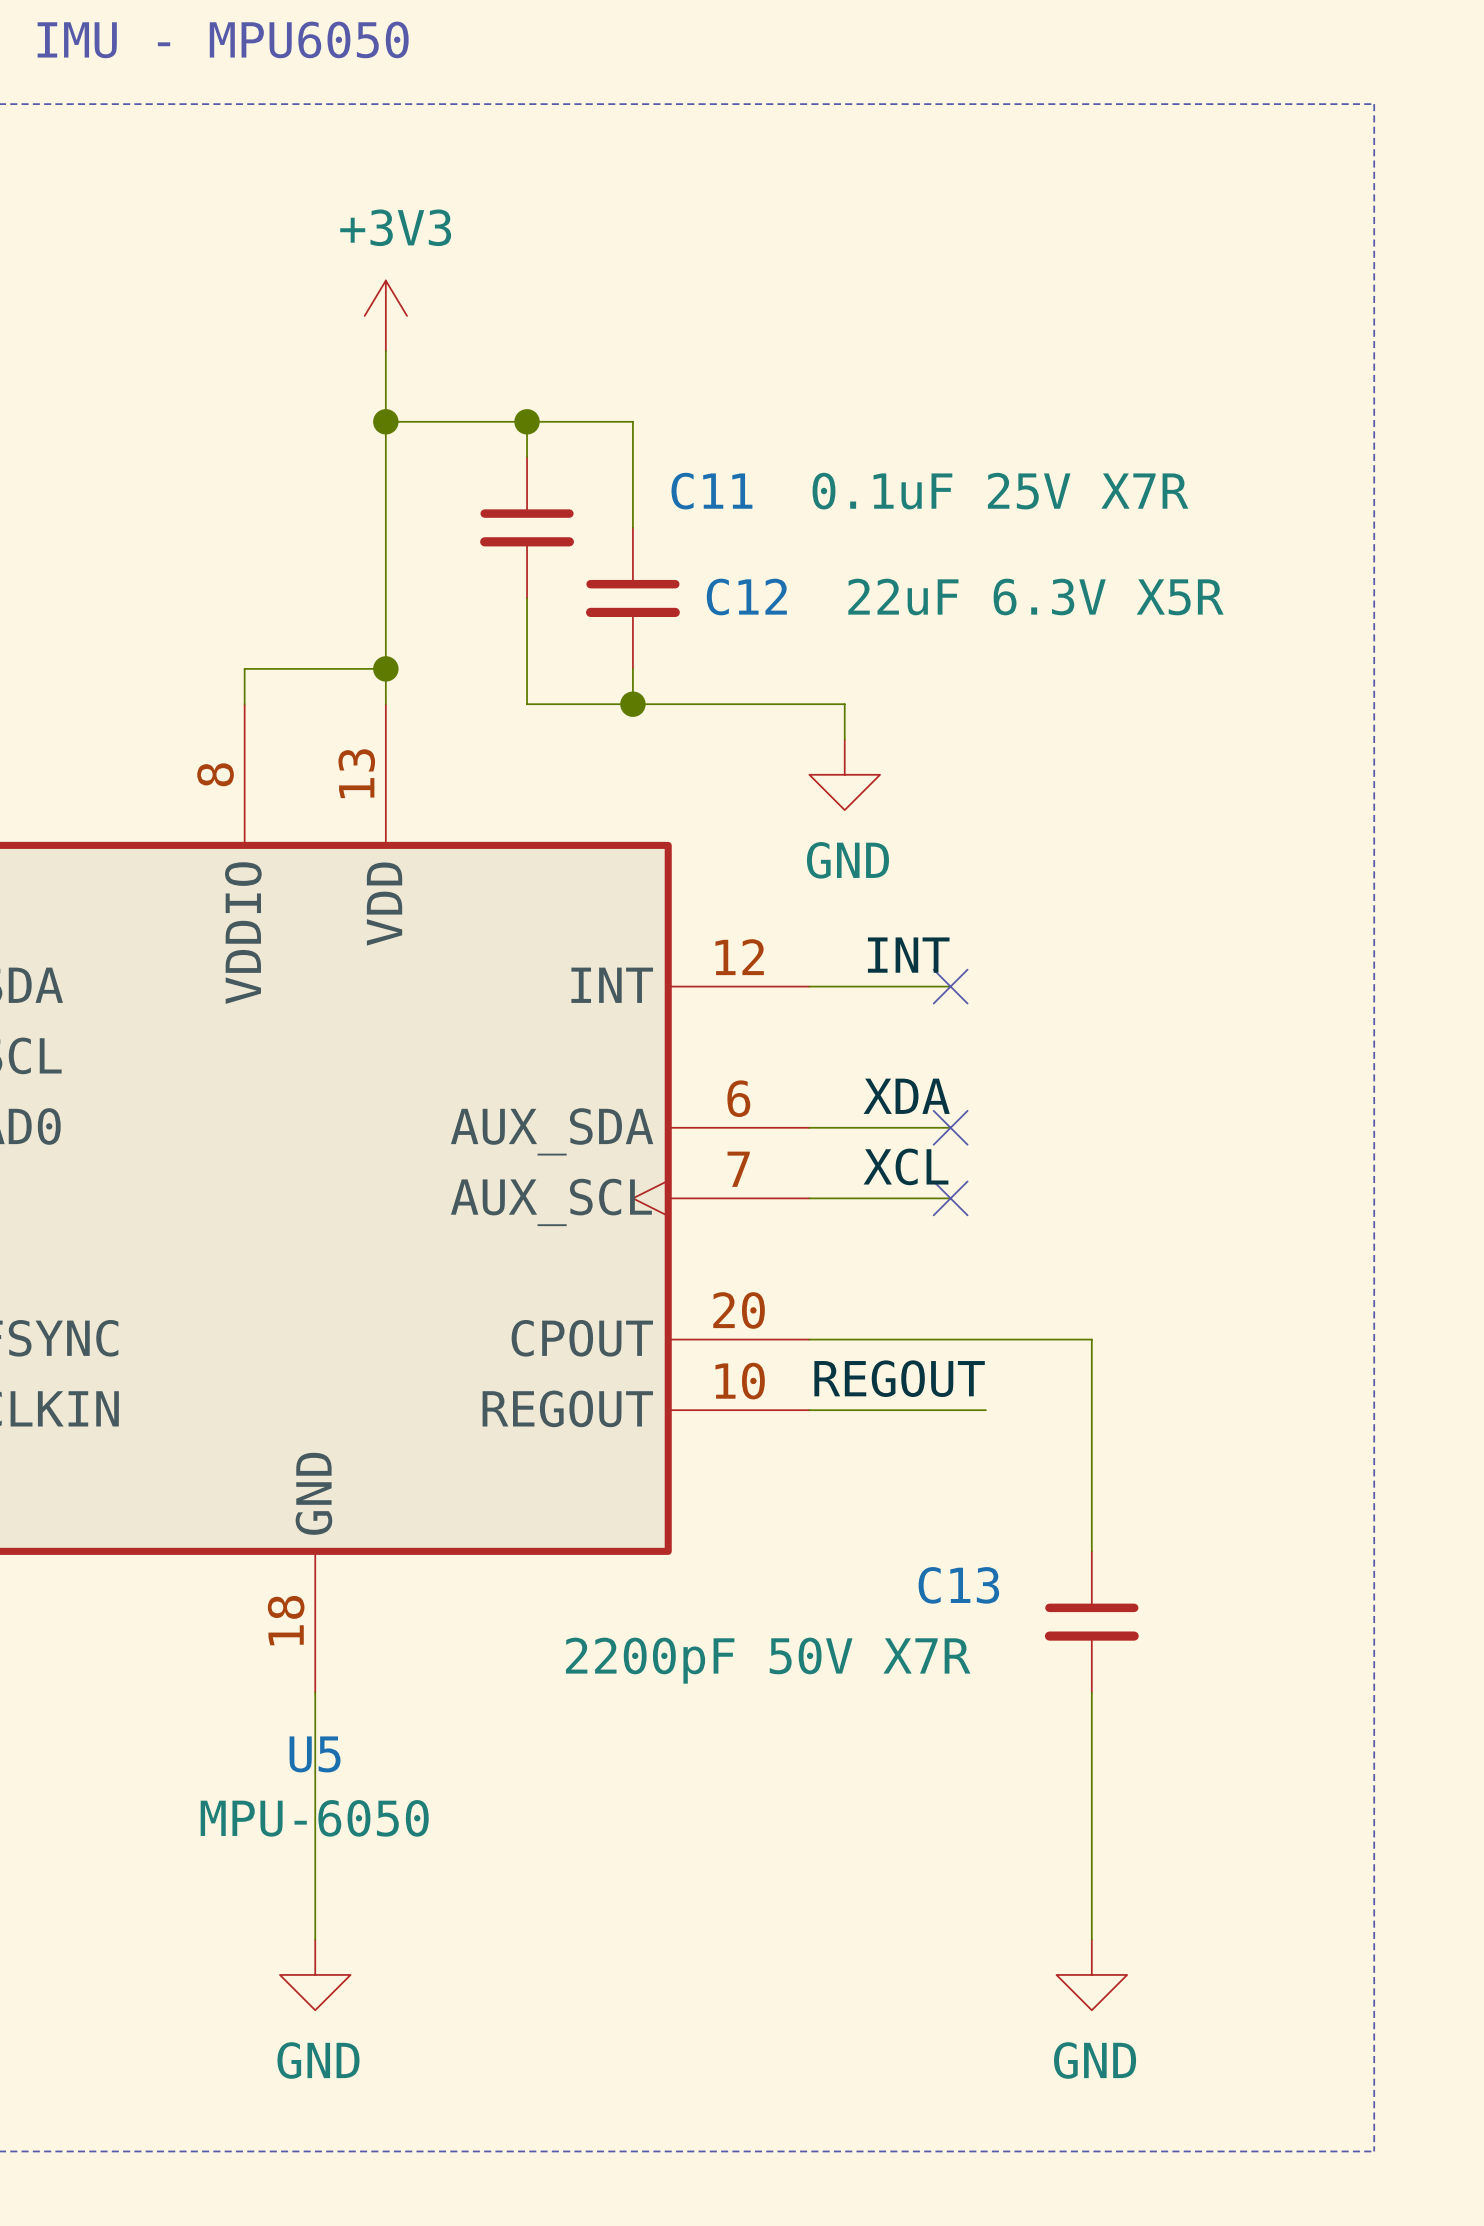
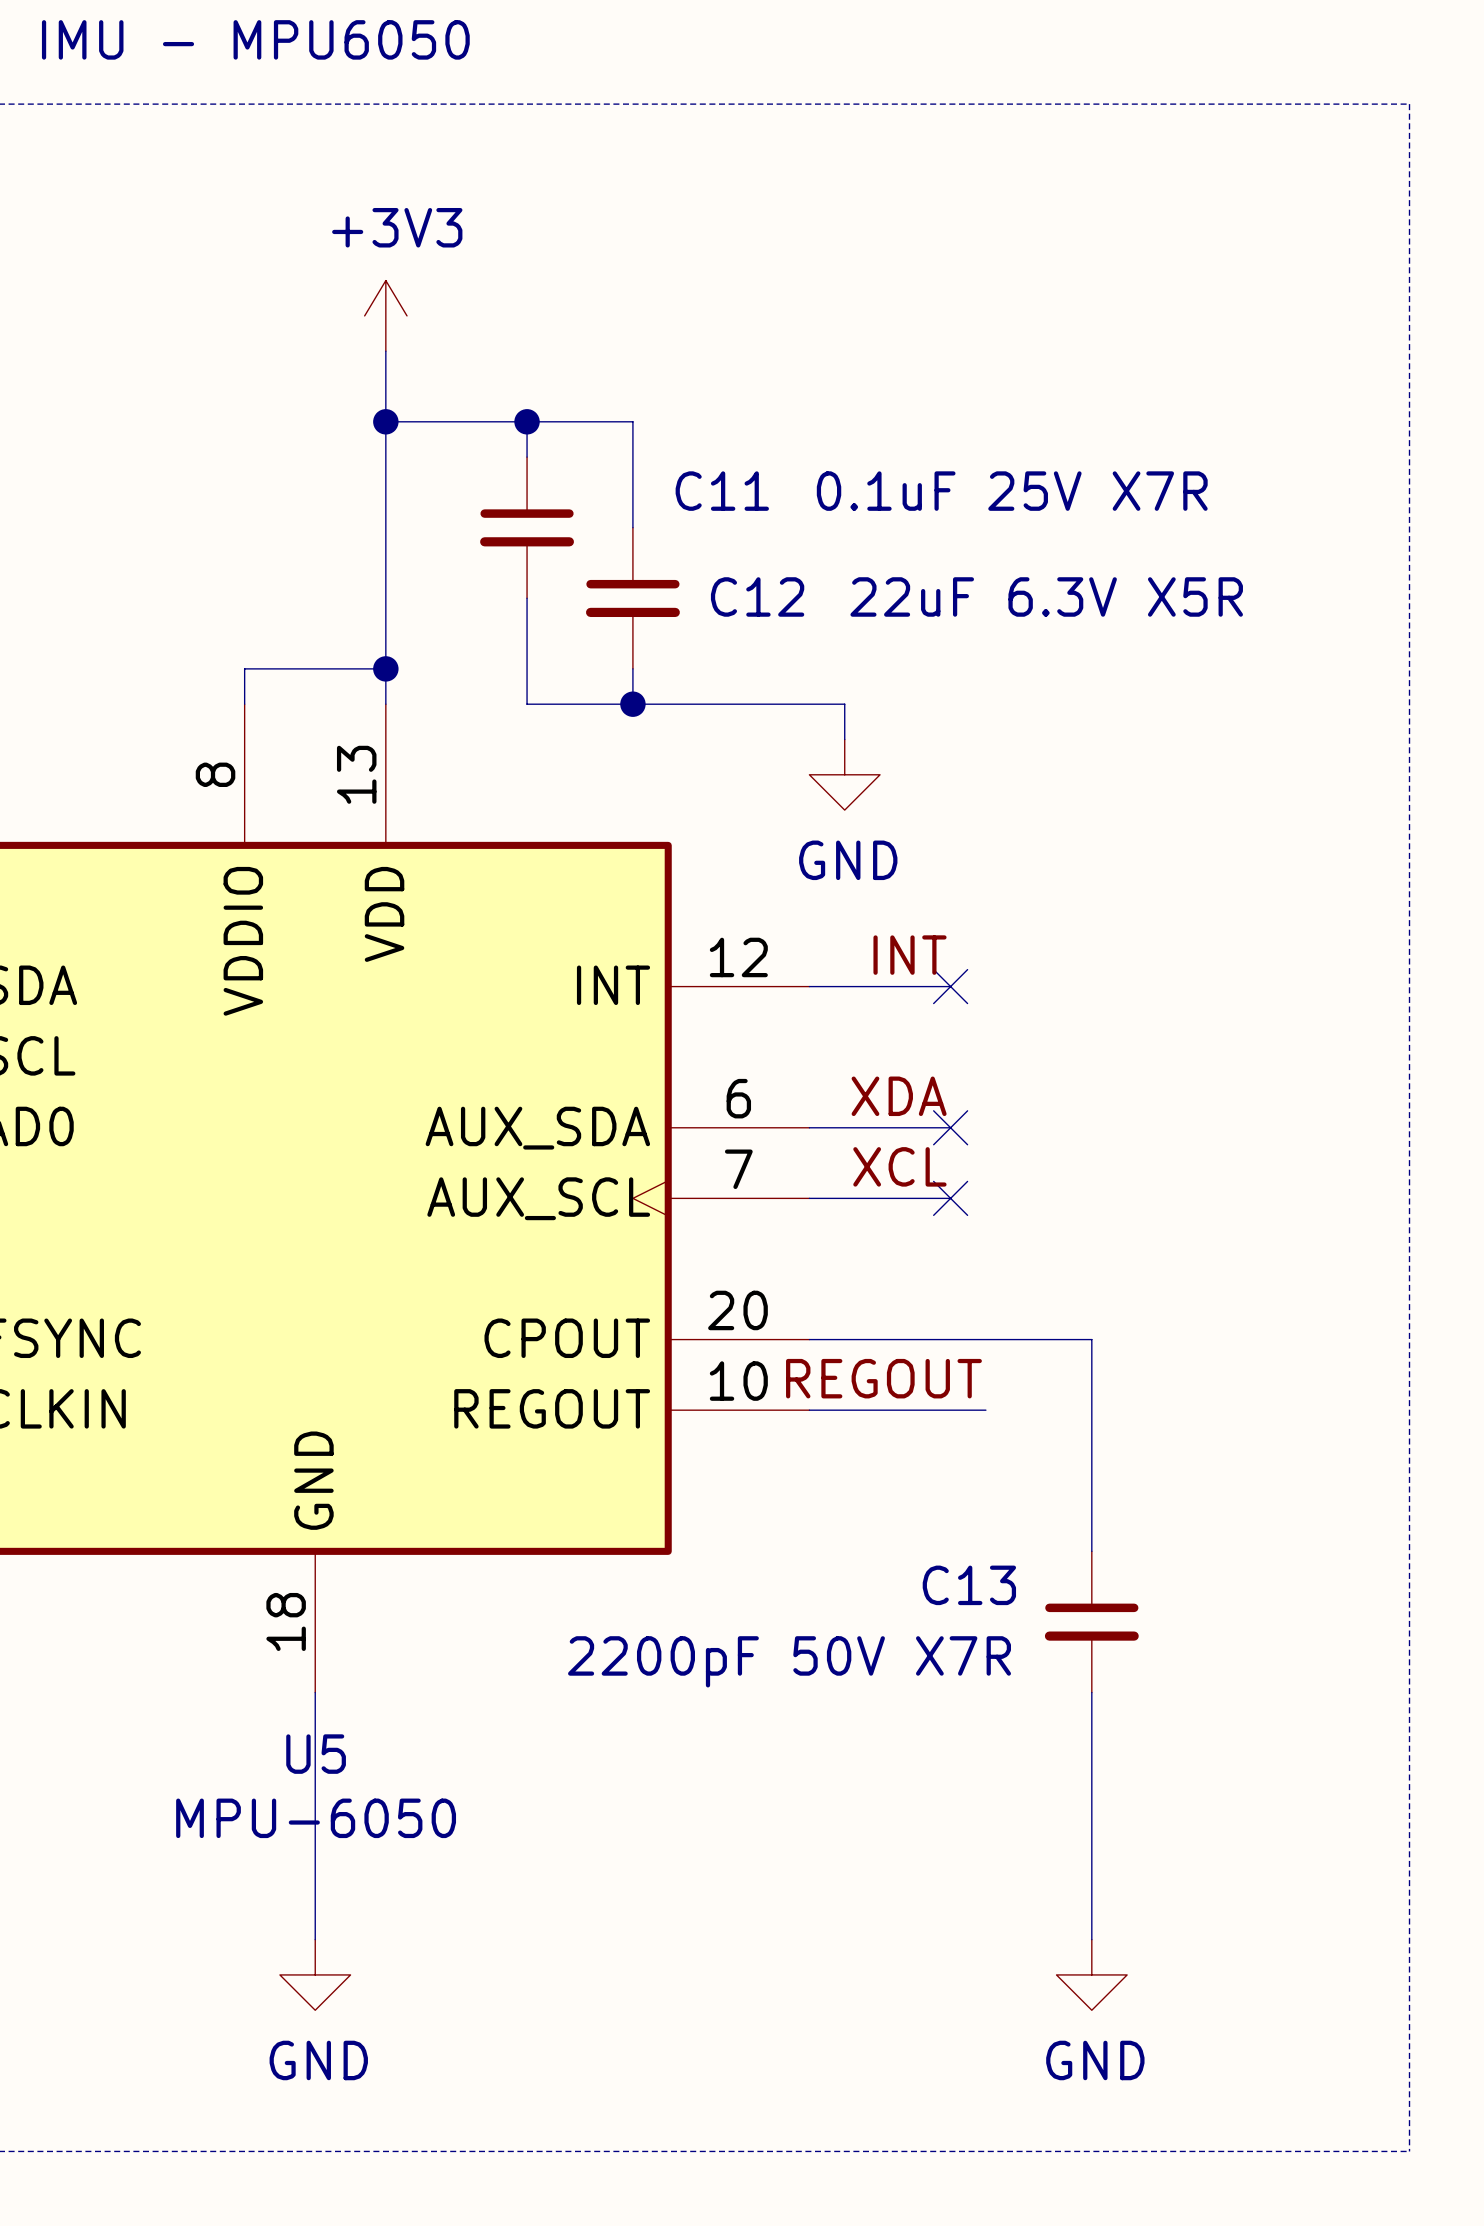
line: (1374, 104) (1374, 2151) -> (1374, 104) (1409, 104) (1409, 2151) (1374, 2151)

